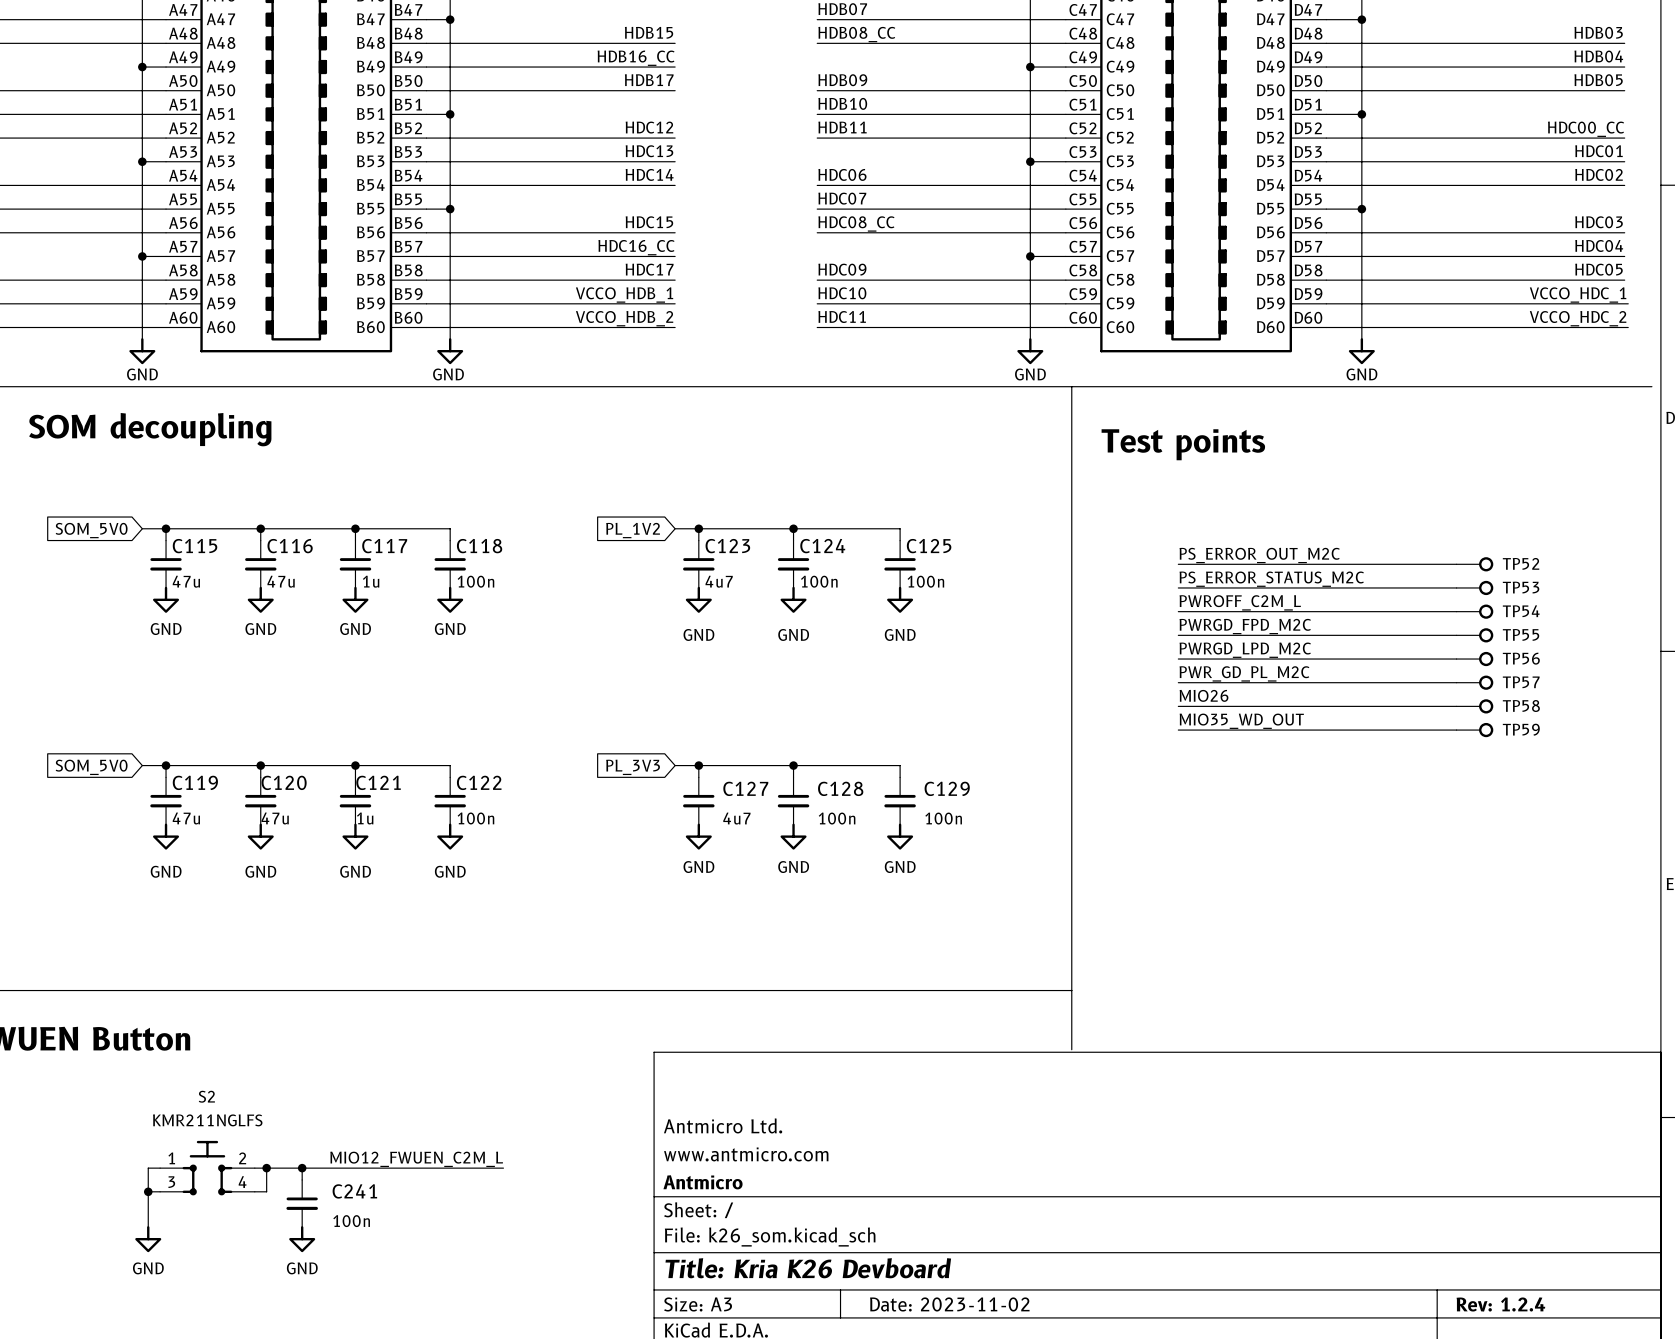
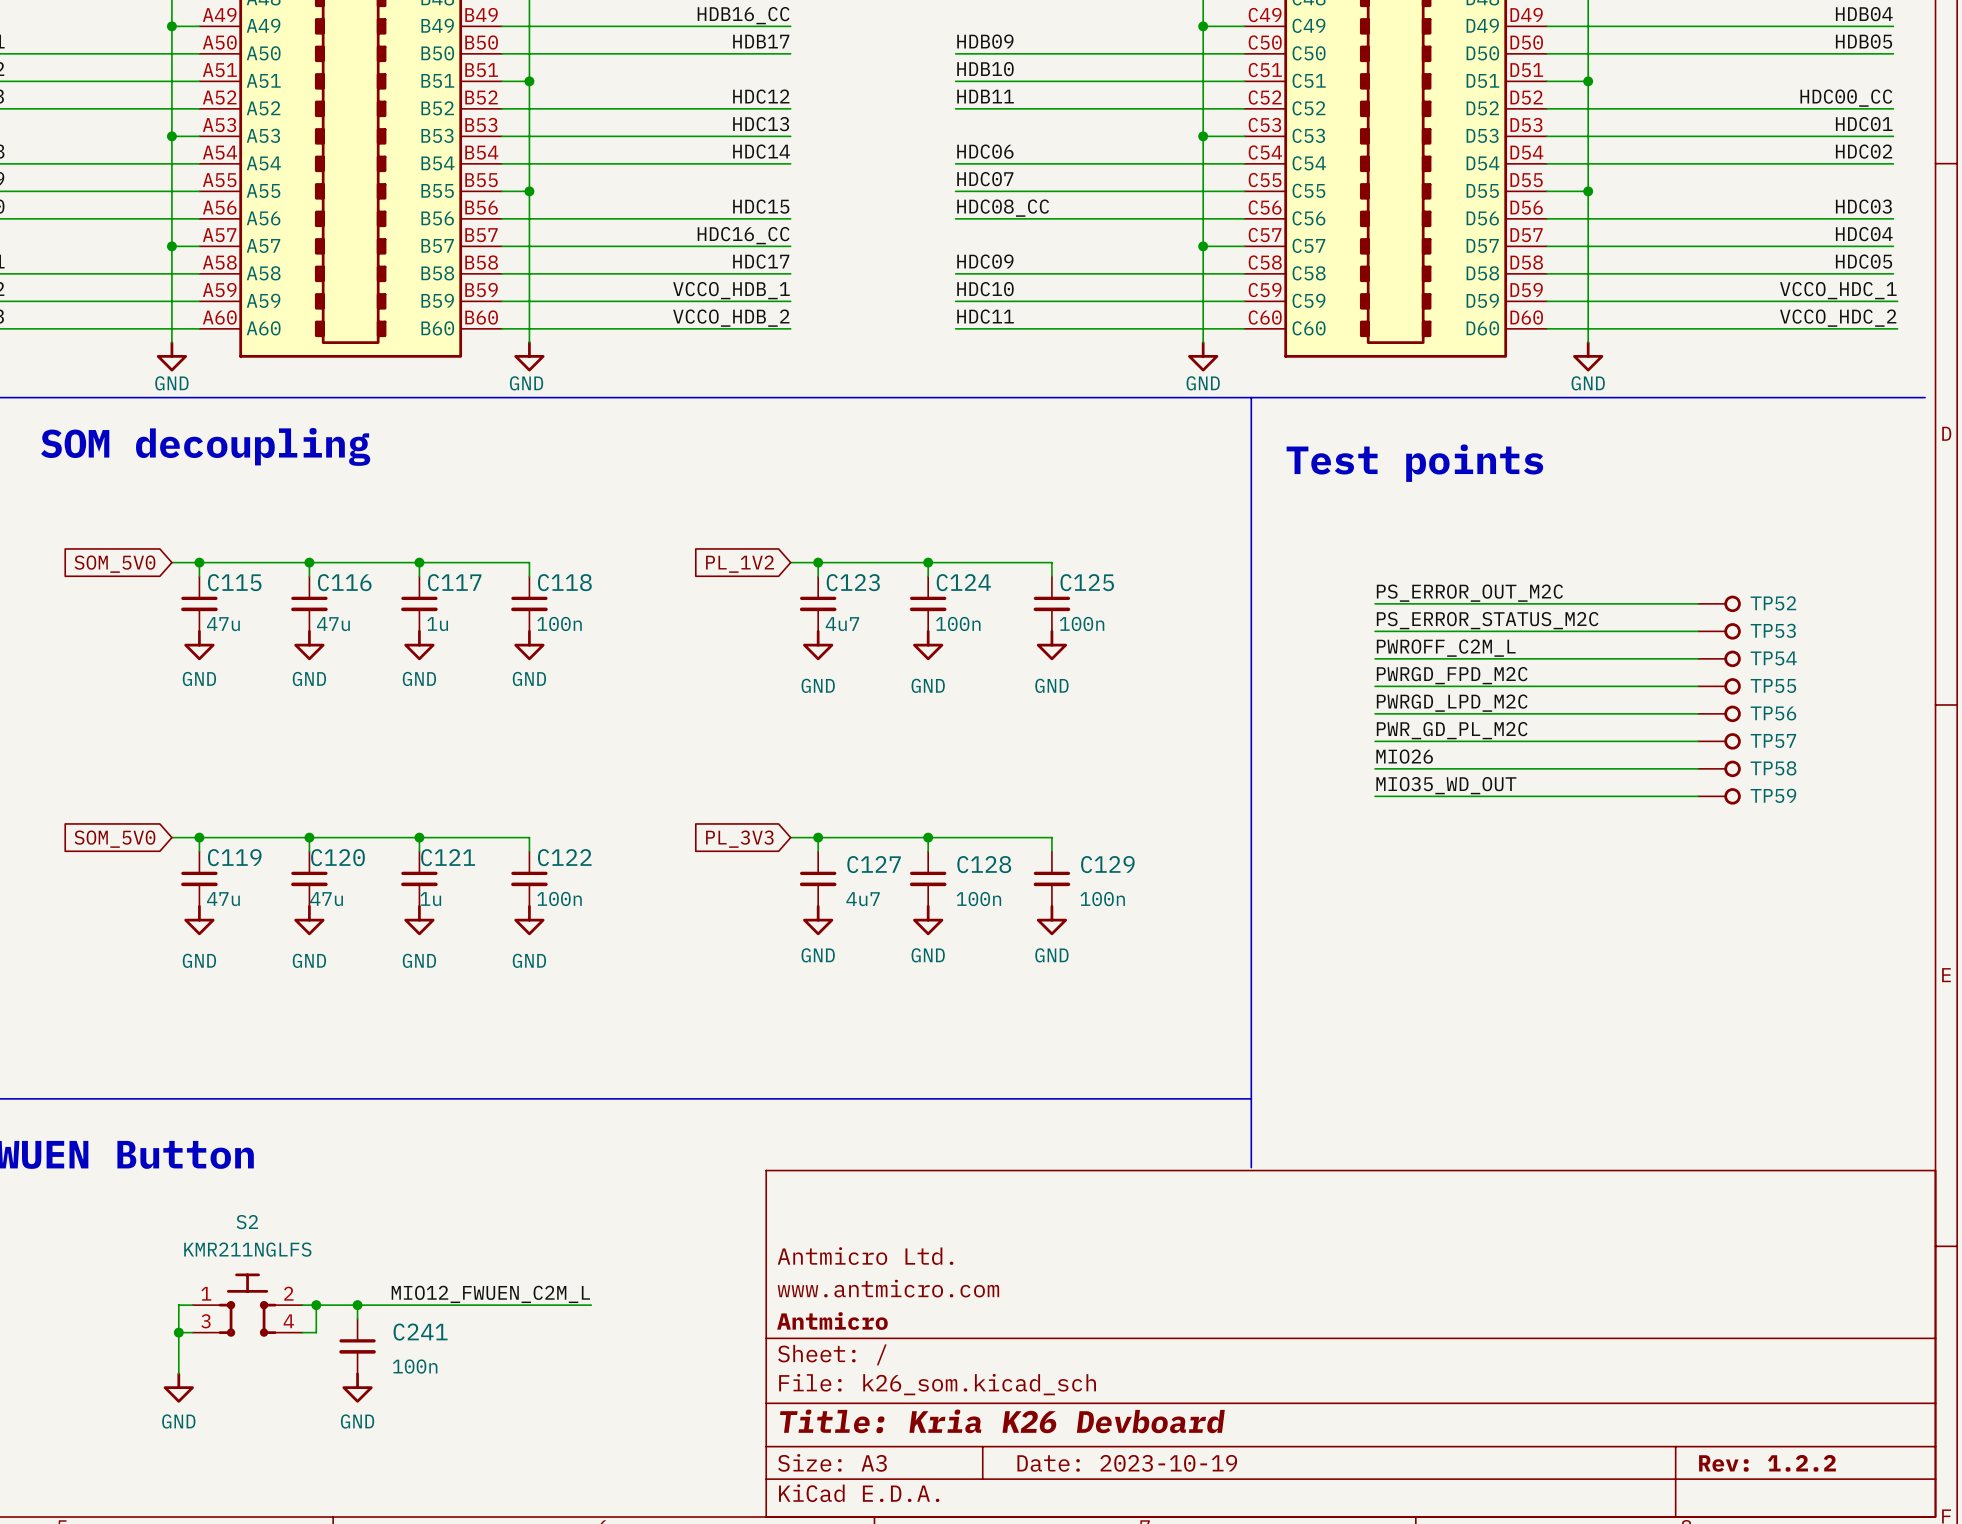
title block: Date: 2023-11-02 (949, 1304) -> Date: 2023-10-19 (1127, 1463)
title block: Rev: 1.2.4 (1500, 1304) -> Rev: 1.2.2 (1767, 1463)

